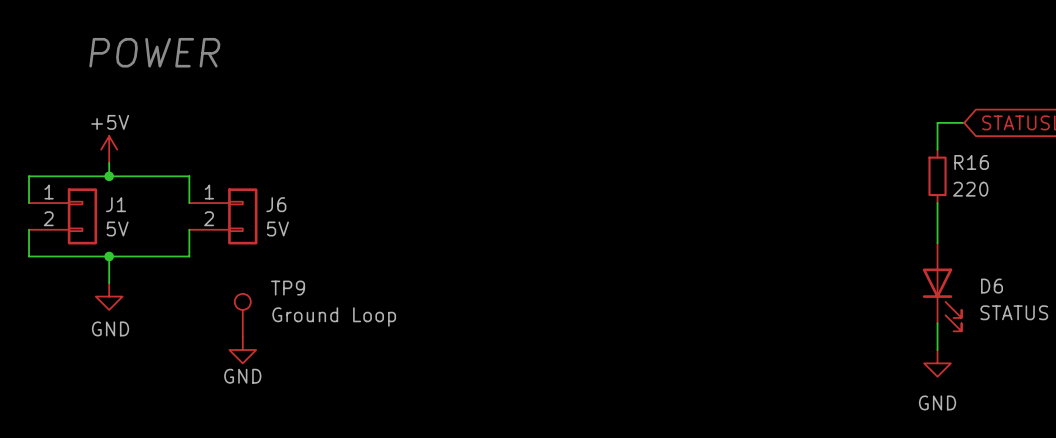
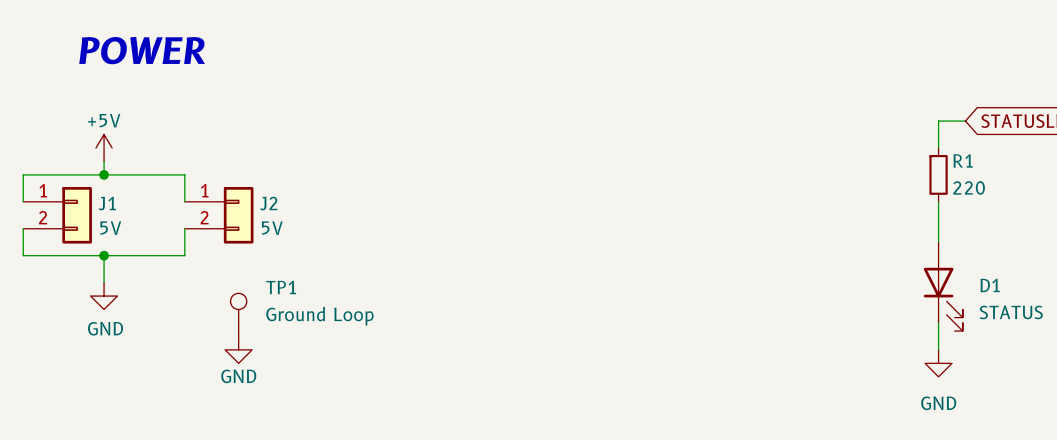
R16 name: R16 (971, 162) -> R1 (963, 160)
J6 name: J6 (276, 204) -> J2 (268, 203)
D6 name: D6 (992, 286) -> D1 (990, 285)
TP9 name: TP9 (288, 288) -> TP1 (281, 287)

